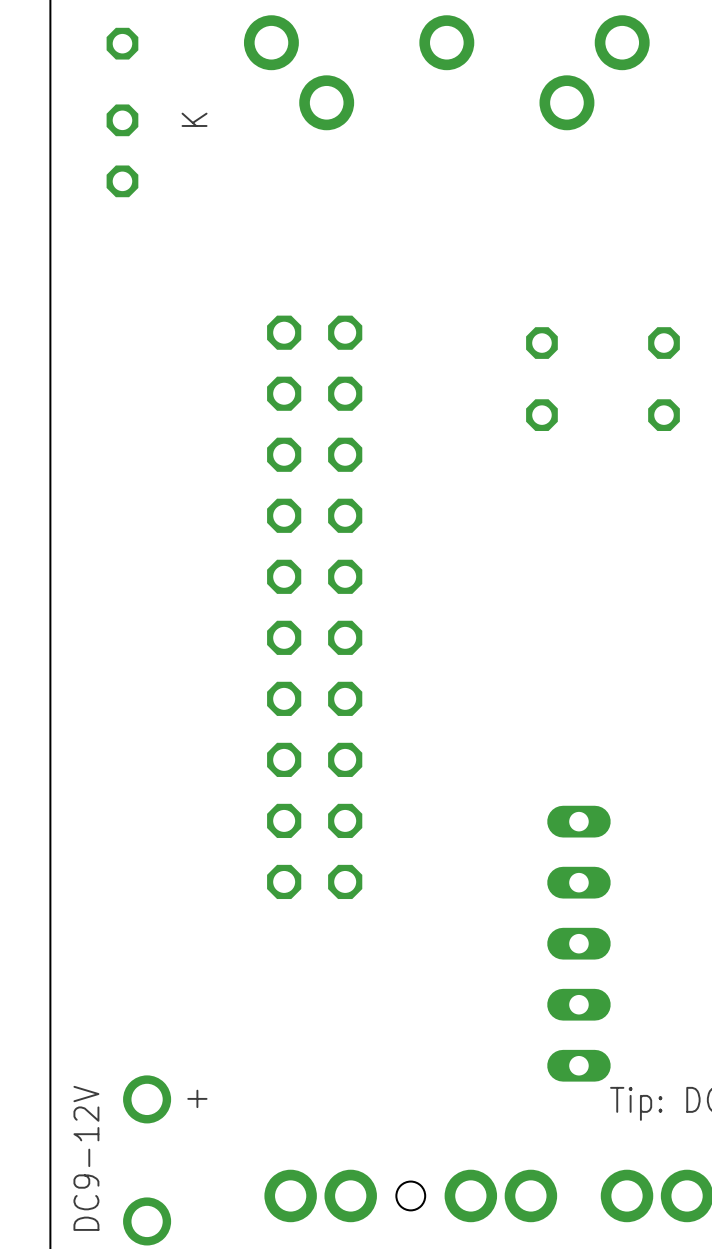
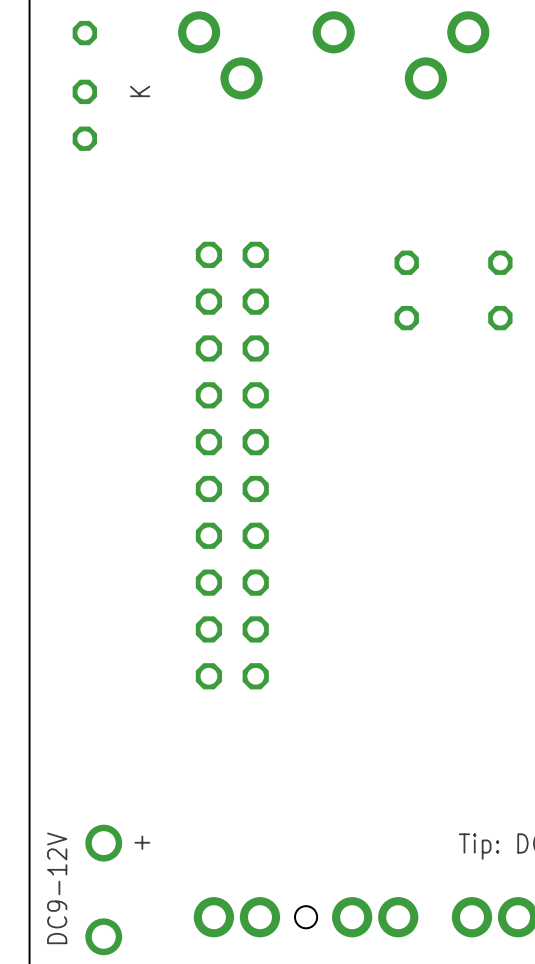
part: (578, 943) -> none

